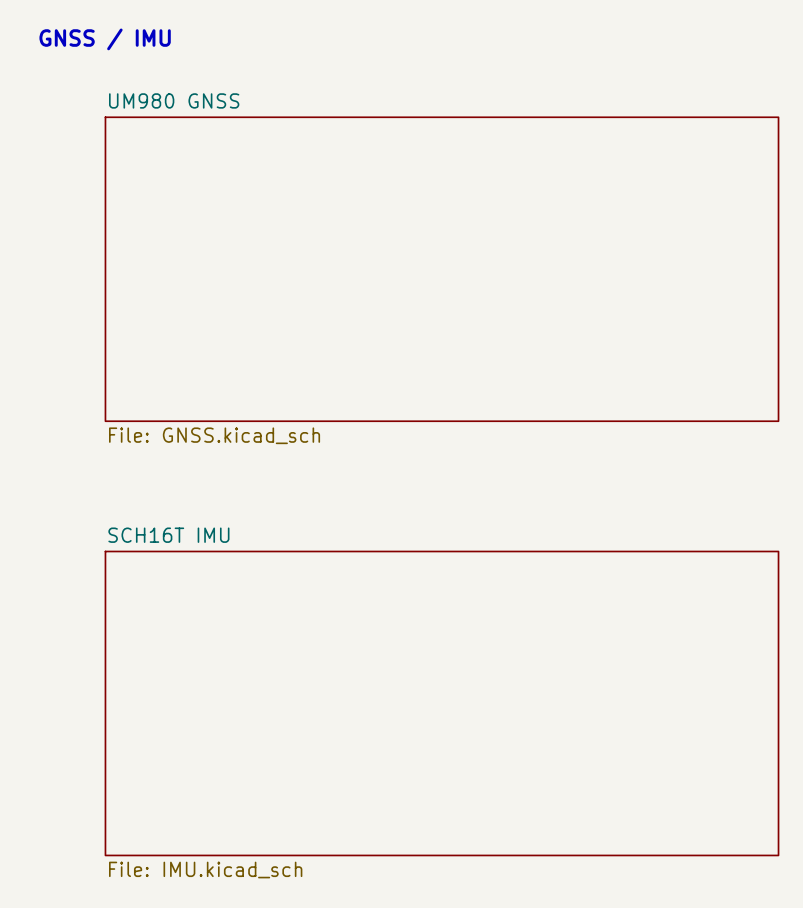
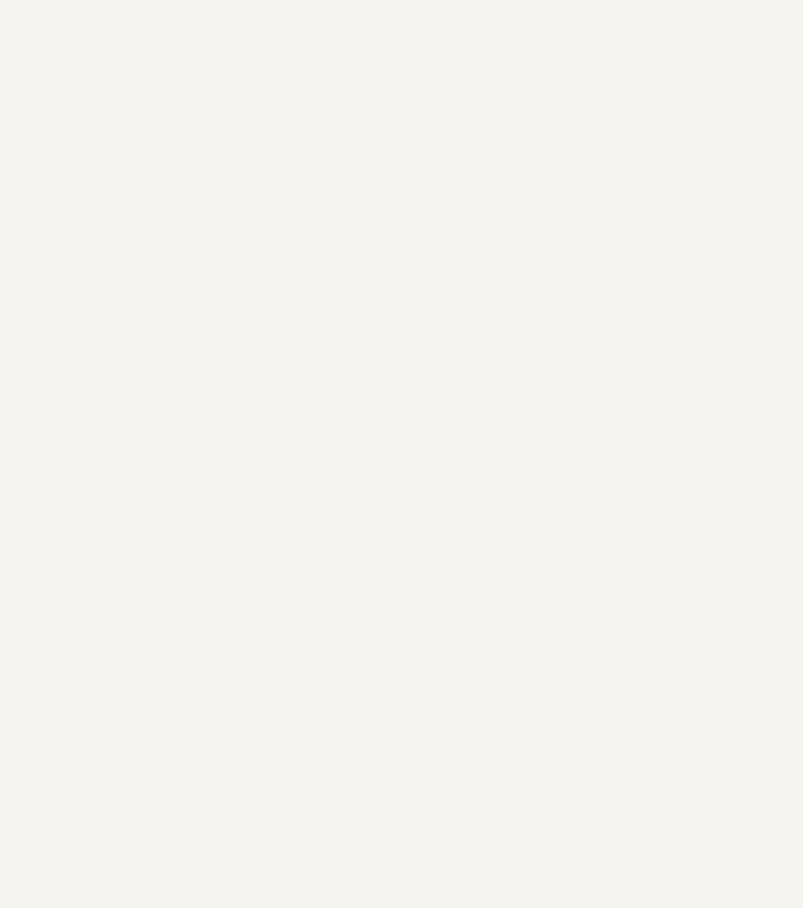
text: GNSS / IMU (105, 39) -> none
sheet UM980 GNSS: File: GNSS.kicad_sch (441, 269) -> none
sheet SCH16T IMU: File: IMU.kicad_sch (441, 703) -> none

